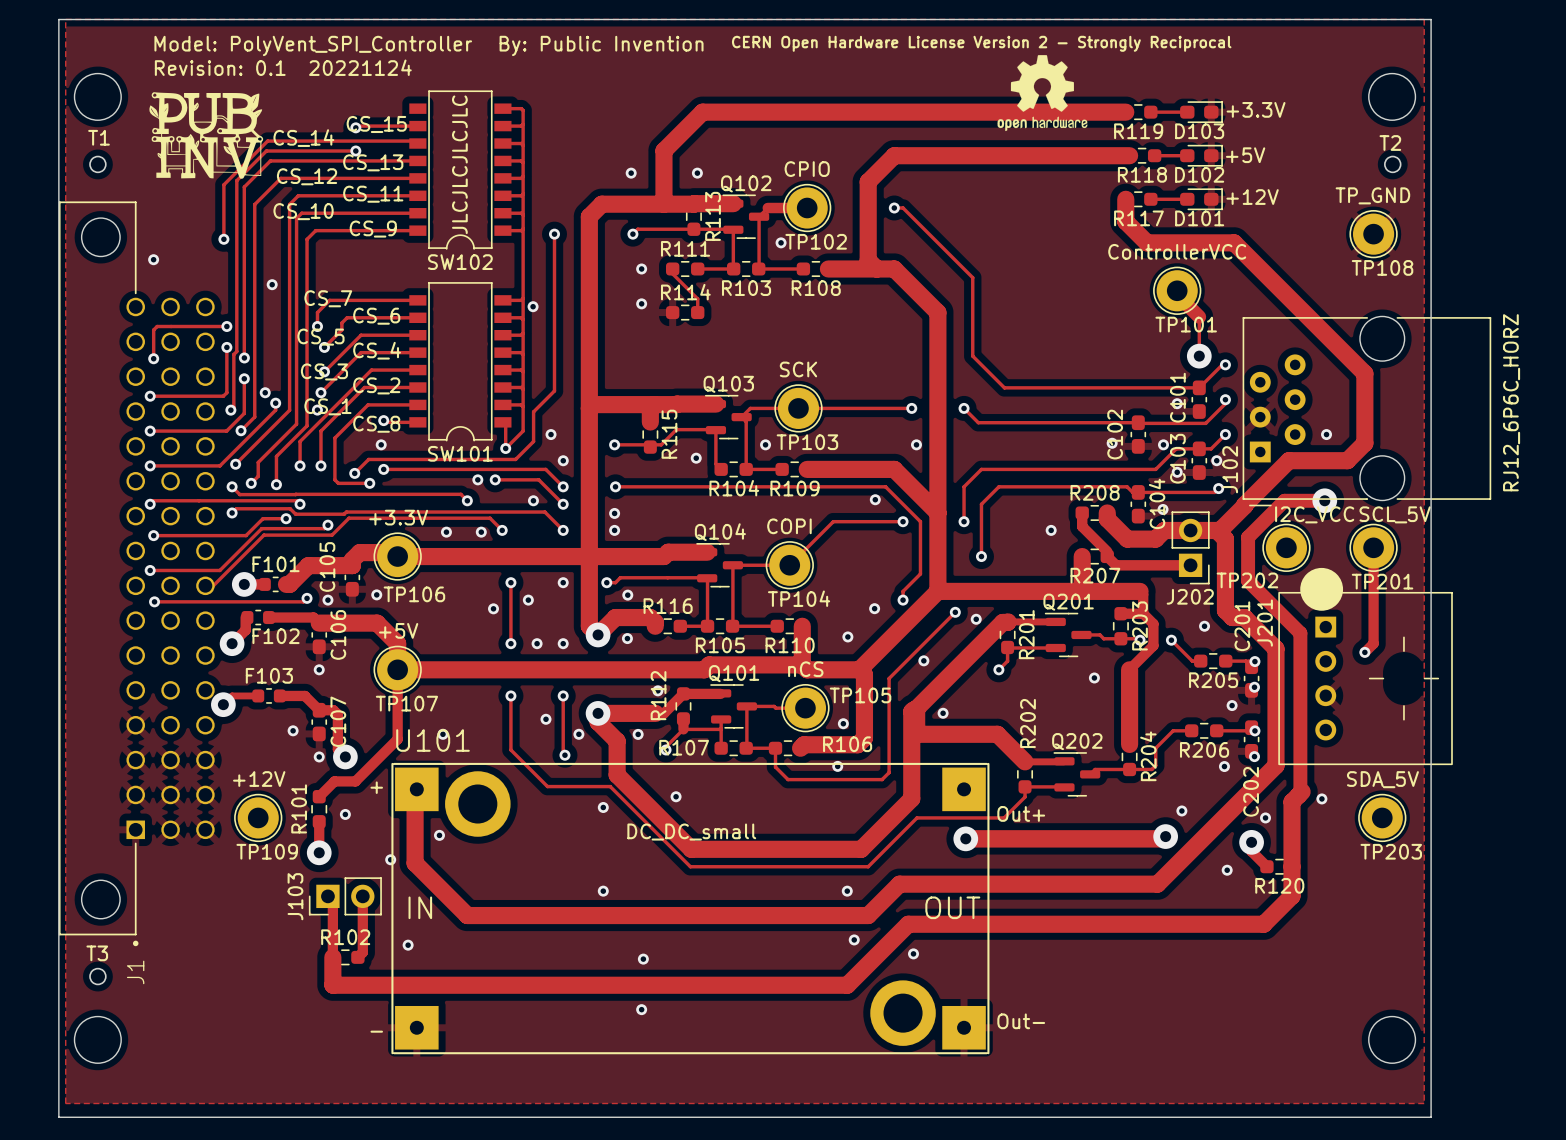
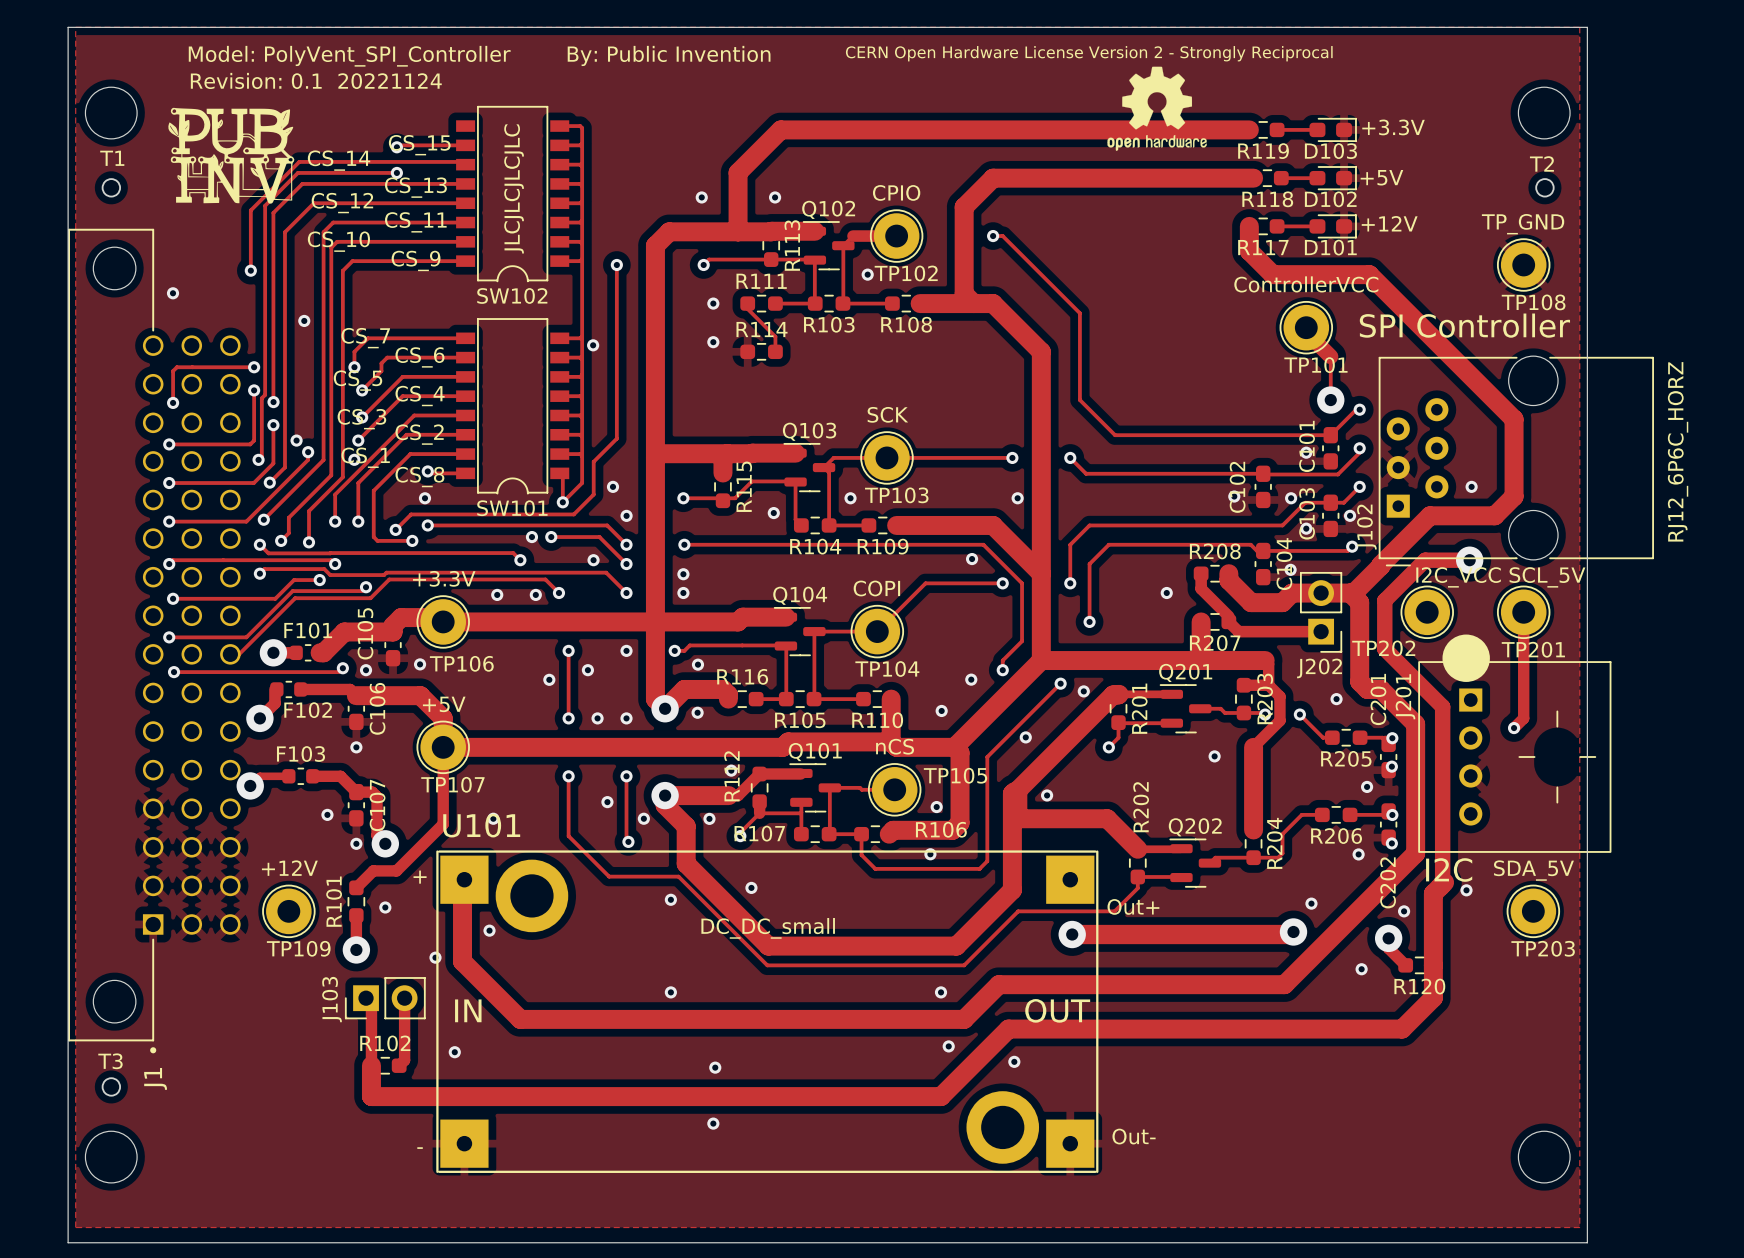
text: none -> SPI Controller (1464, 325)
text: none -> I2C (1449, 870)

